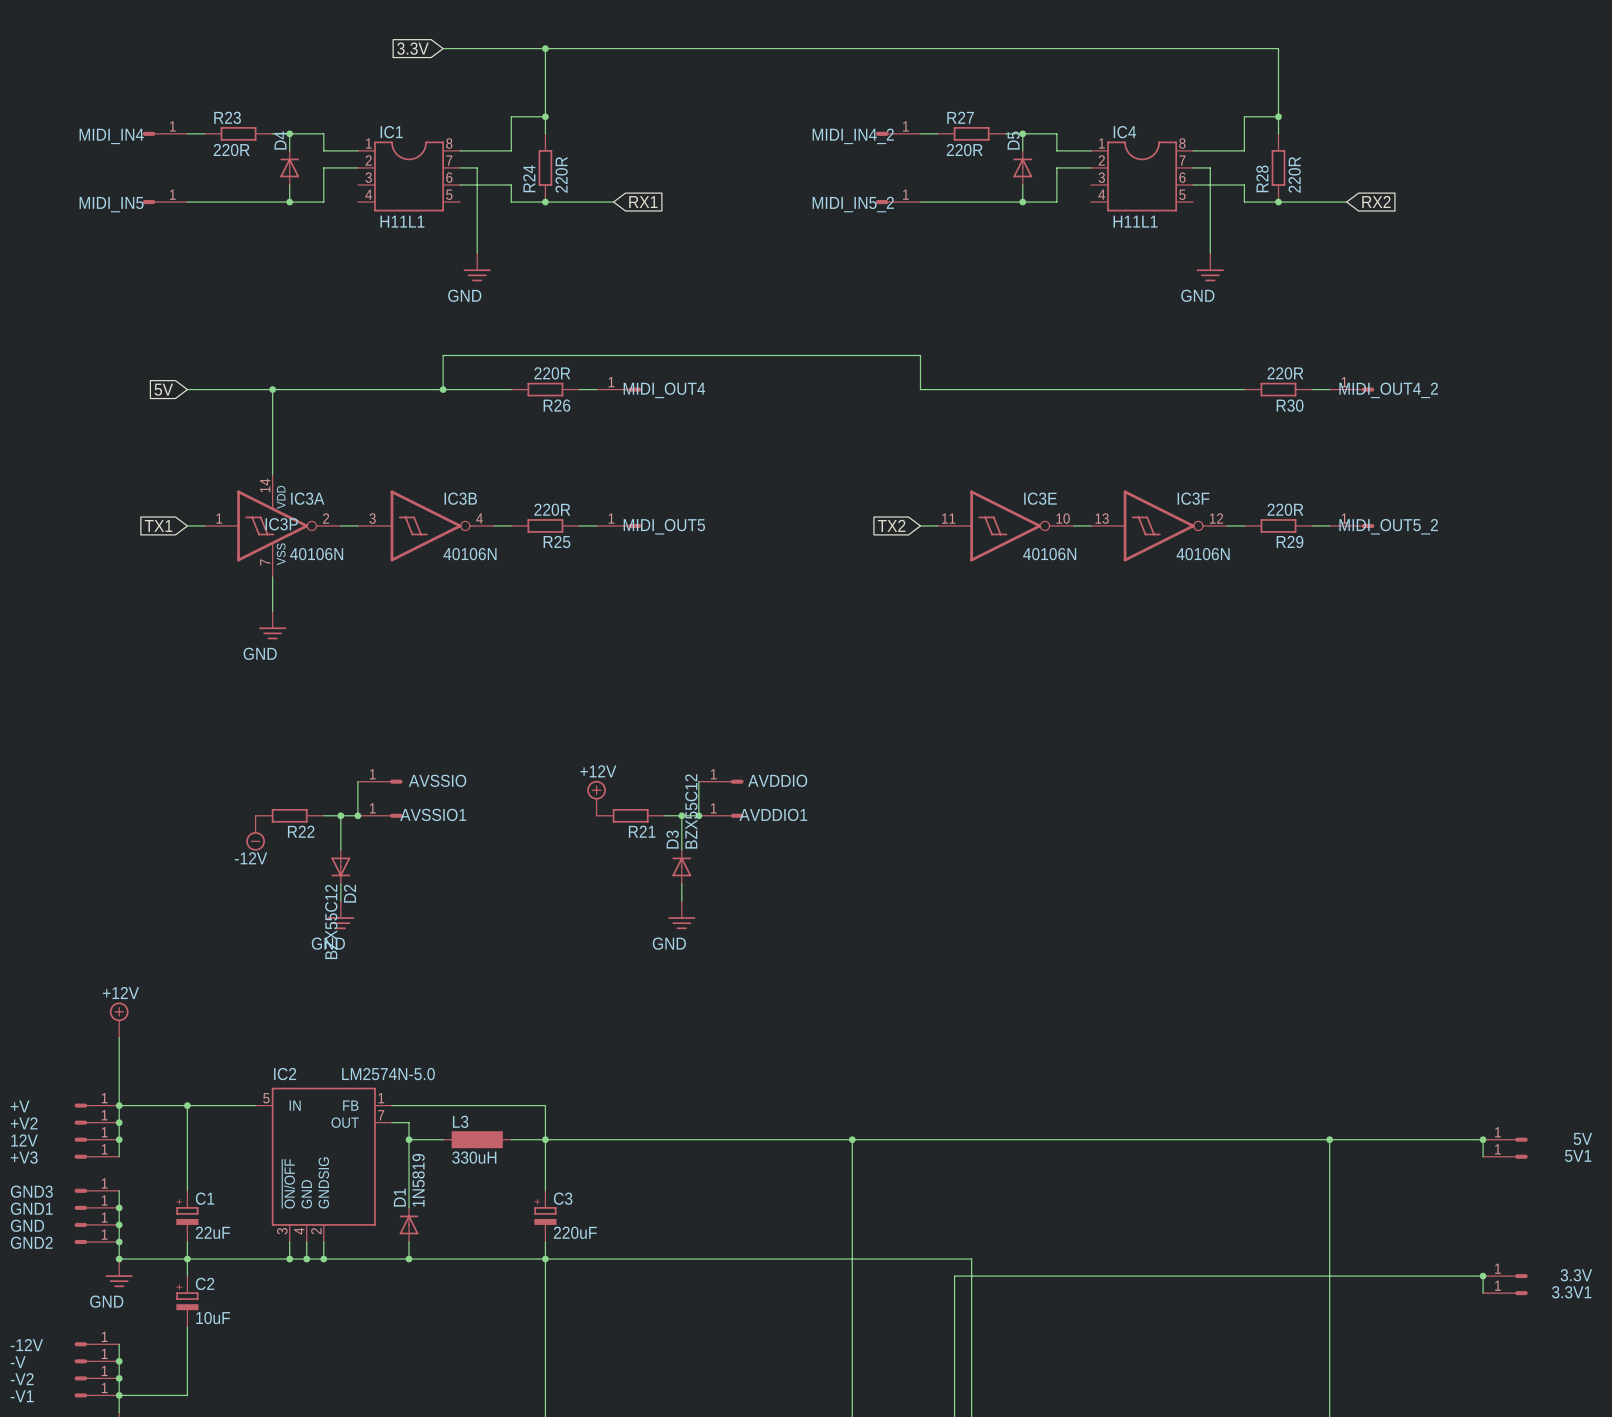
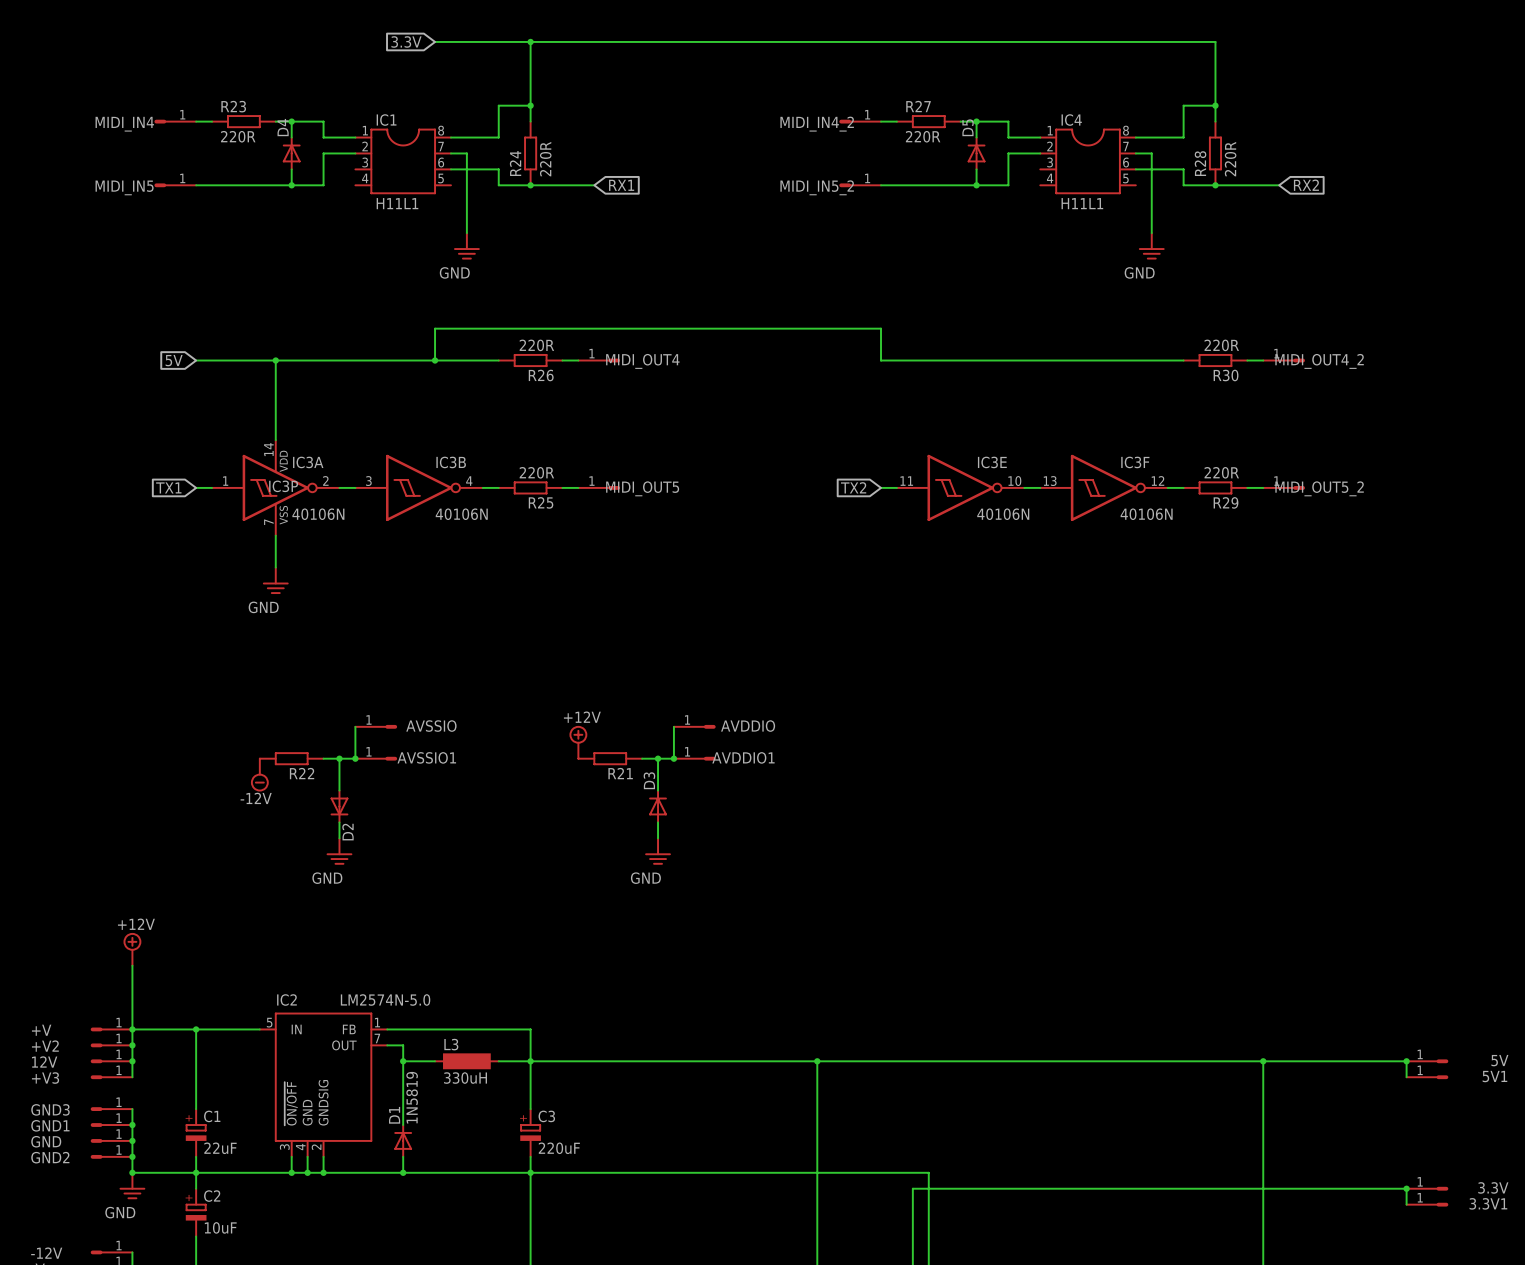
D3 value: BZX55C12 (691, 811) -> none
D2 value: BZX55C12 (331, 921) -> none

